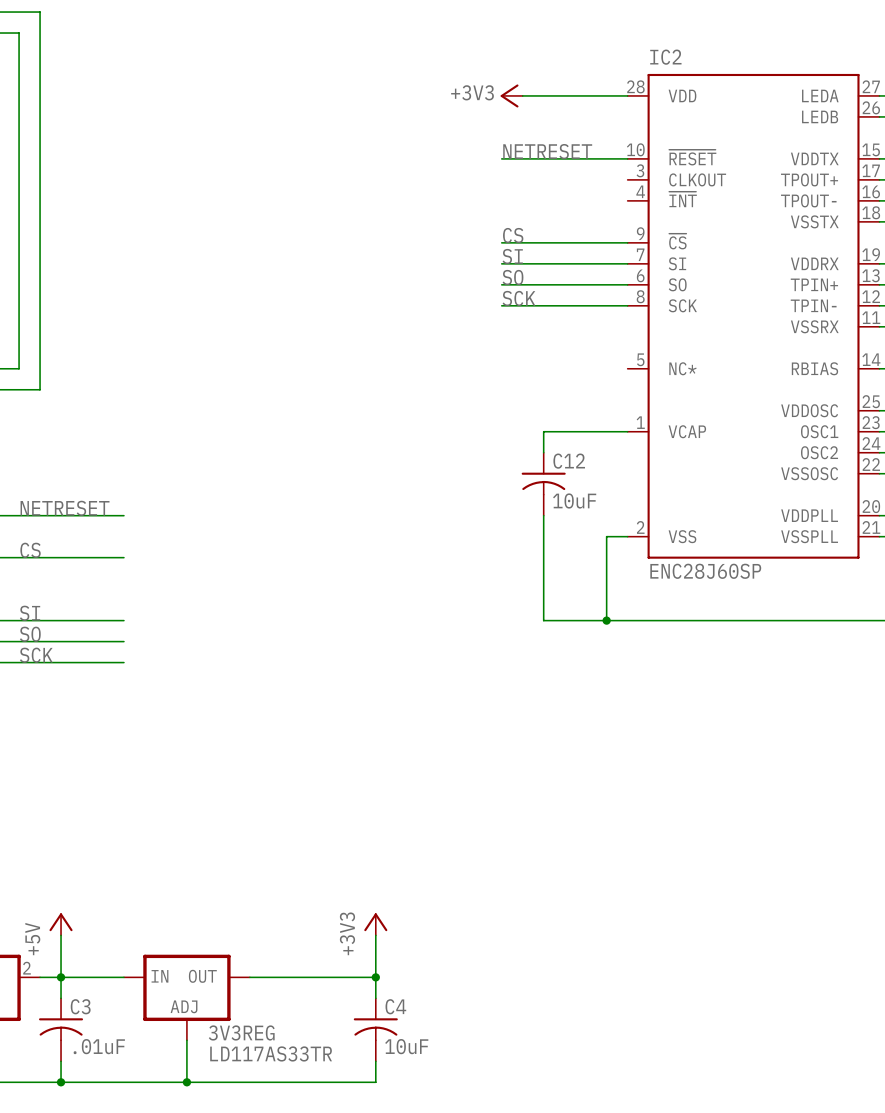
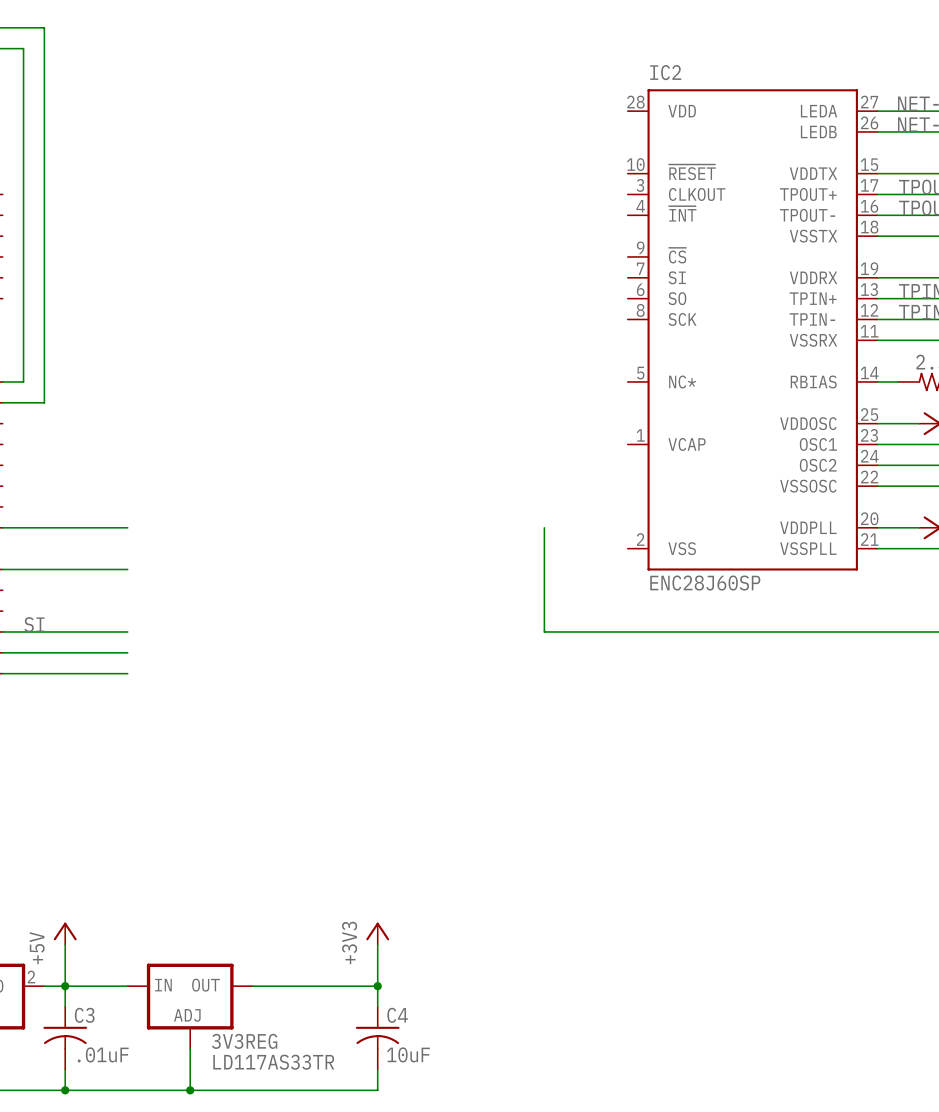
power symbol: +3V3 (511, 95) -> none
wire: (522, 95) (627, 95) -> none
label: NETRESET (547, 151) -> none
wire: (501, 158) (627, 158) -> none
label: CS (513, 235) -> none
wire: (501, 242) (627, 242) -> none
label: SI (512, 256) -> none
wire: (501, 263) (627, 263) -> none
label: SO (512, 277) -> none
wire: (501, 284) (627, 284) -> none
label: SCK (518, 298) -> none
wire: (501, 305) (627, 305) -> none
wire: (627, 431) (543, 431) (543, 452) -> none
C12: 10uF (543, 484) -> none
label: NETRESET (65, 508) -> none
wire: (627, 536) (606, 536) (606, 620) -> none
label: CS (30, 550) -> none
junction: (606, 620) -> none
label: SO (30, 634) -> none
label: SCK (36, 655) -> none

